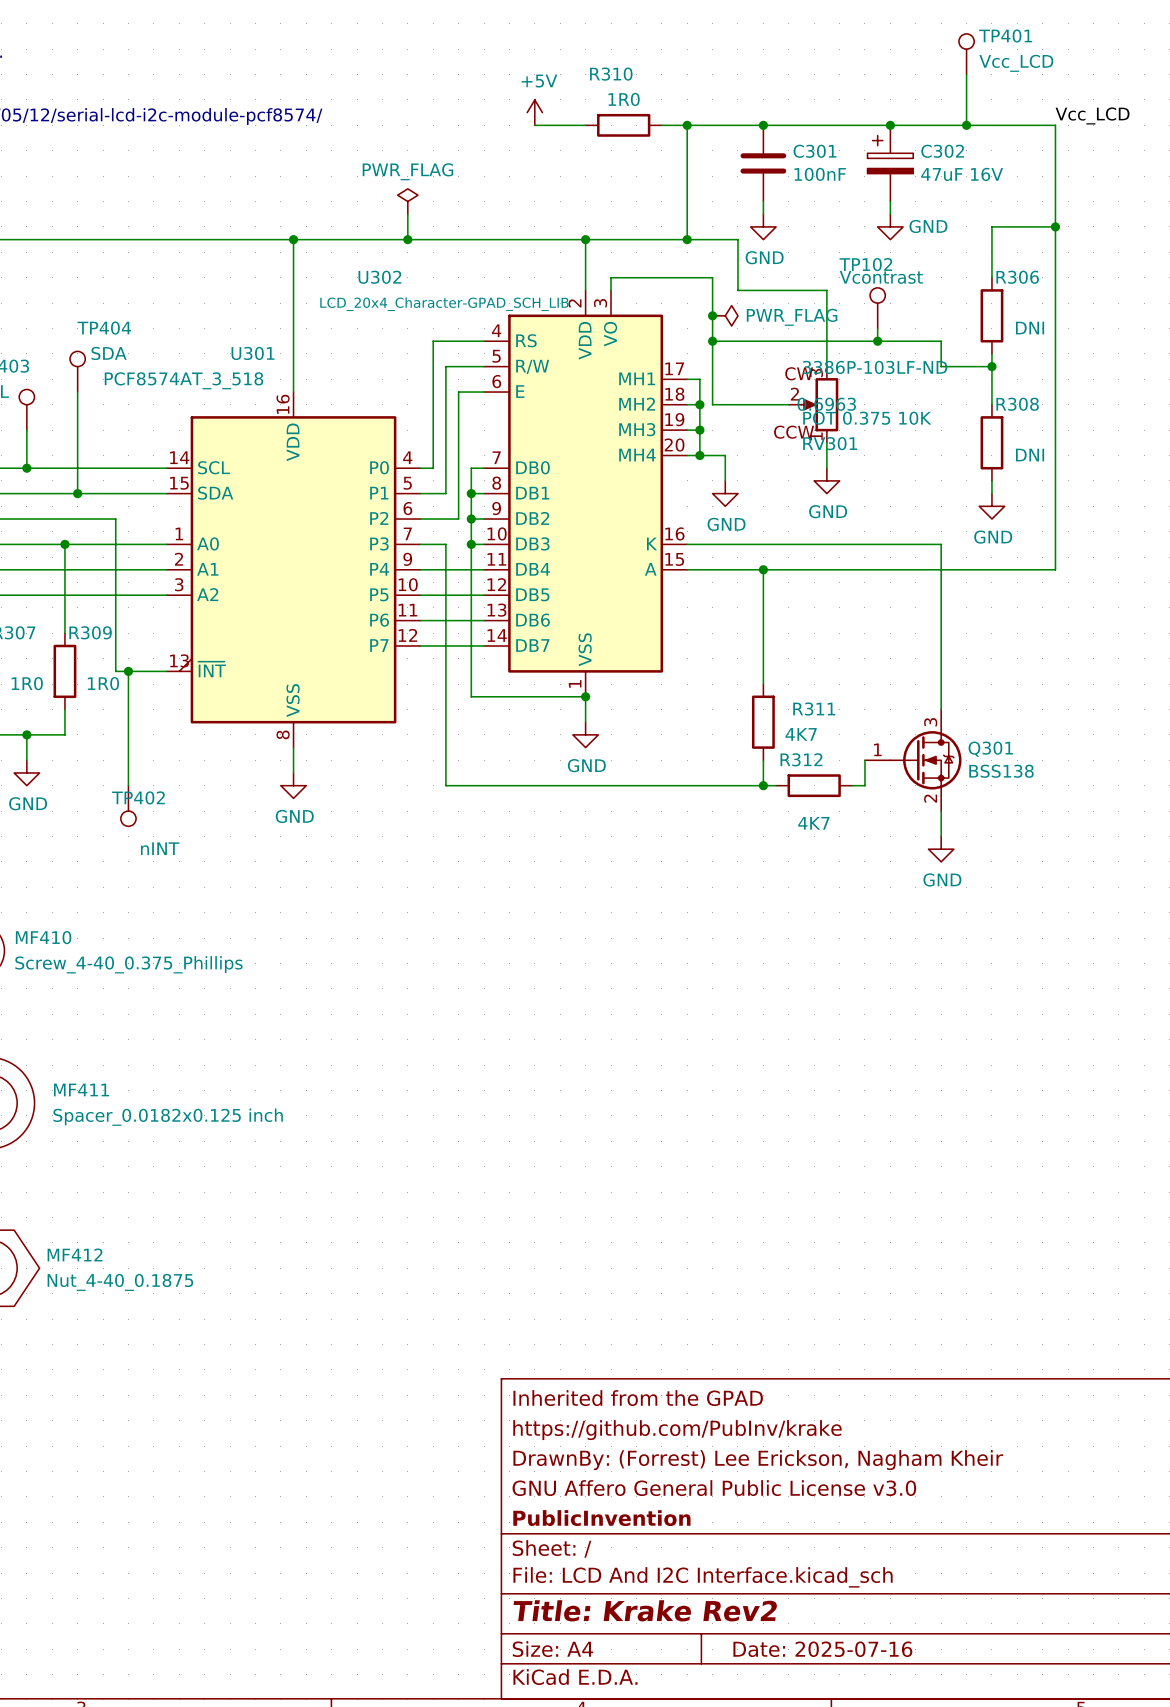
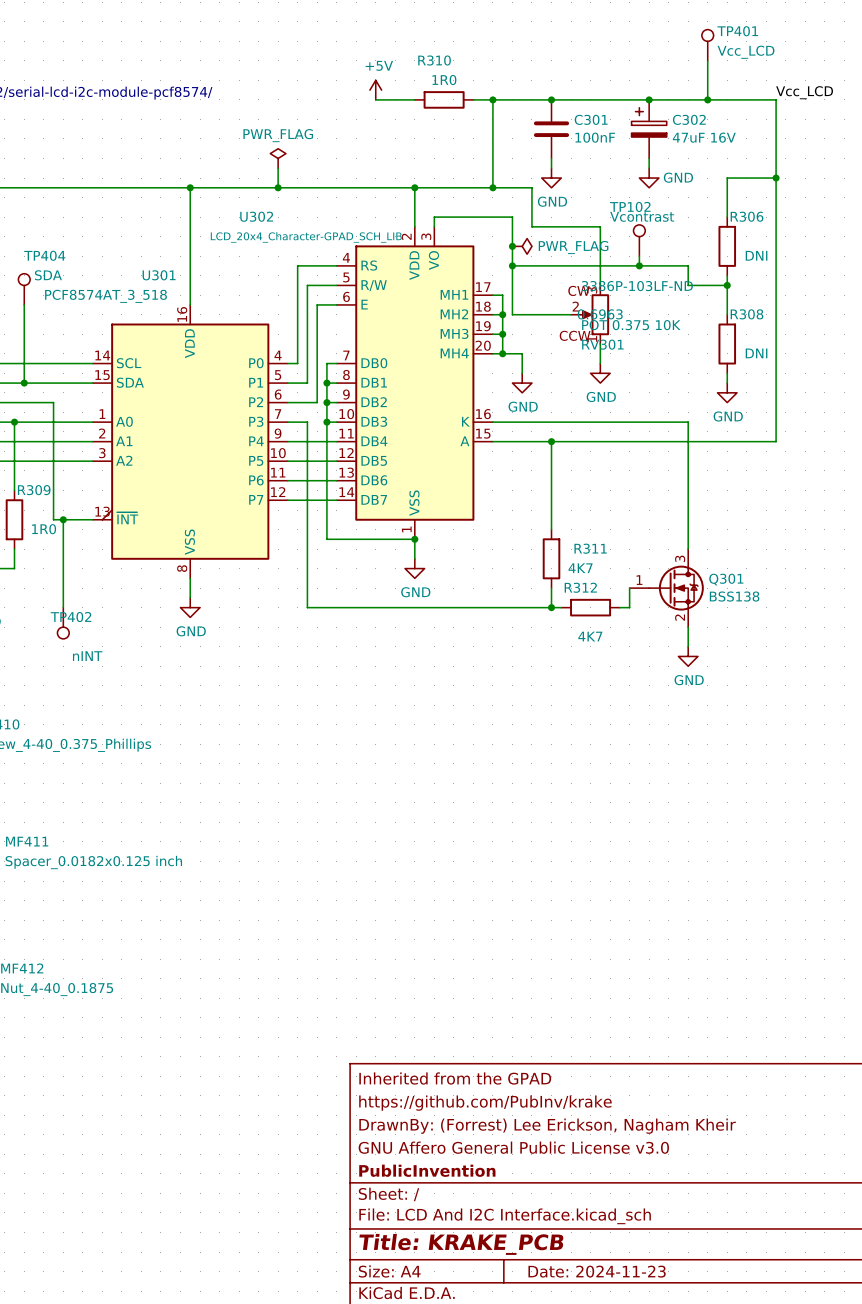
title block: Title: Krake Rev2 (645, 1610) -> Title: KRAKE_PCB (461, 1244)
title block: Date: 2025-07-16 (822, 1649) -> Date: 2024-11-23 (597, 1271)

